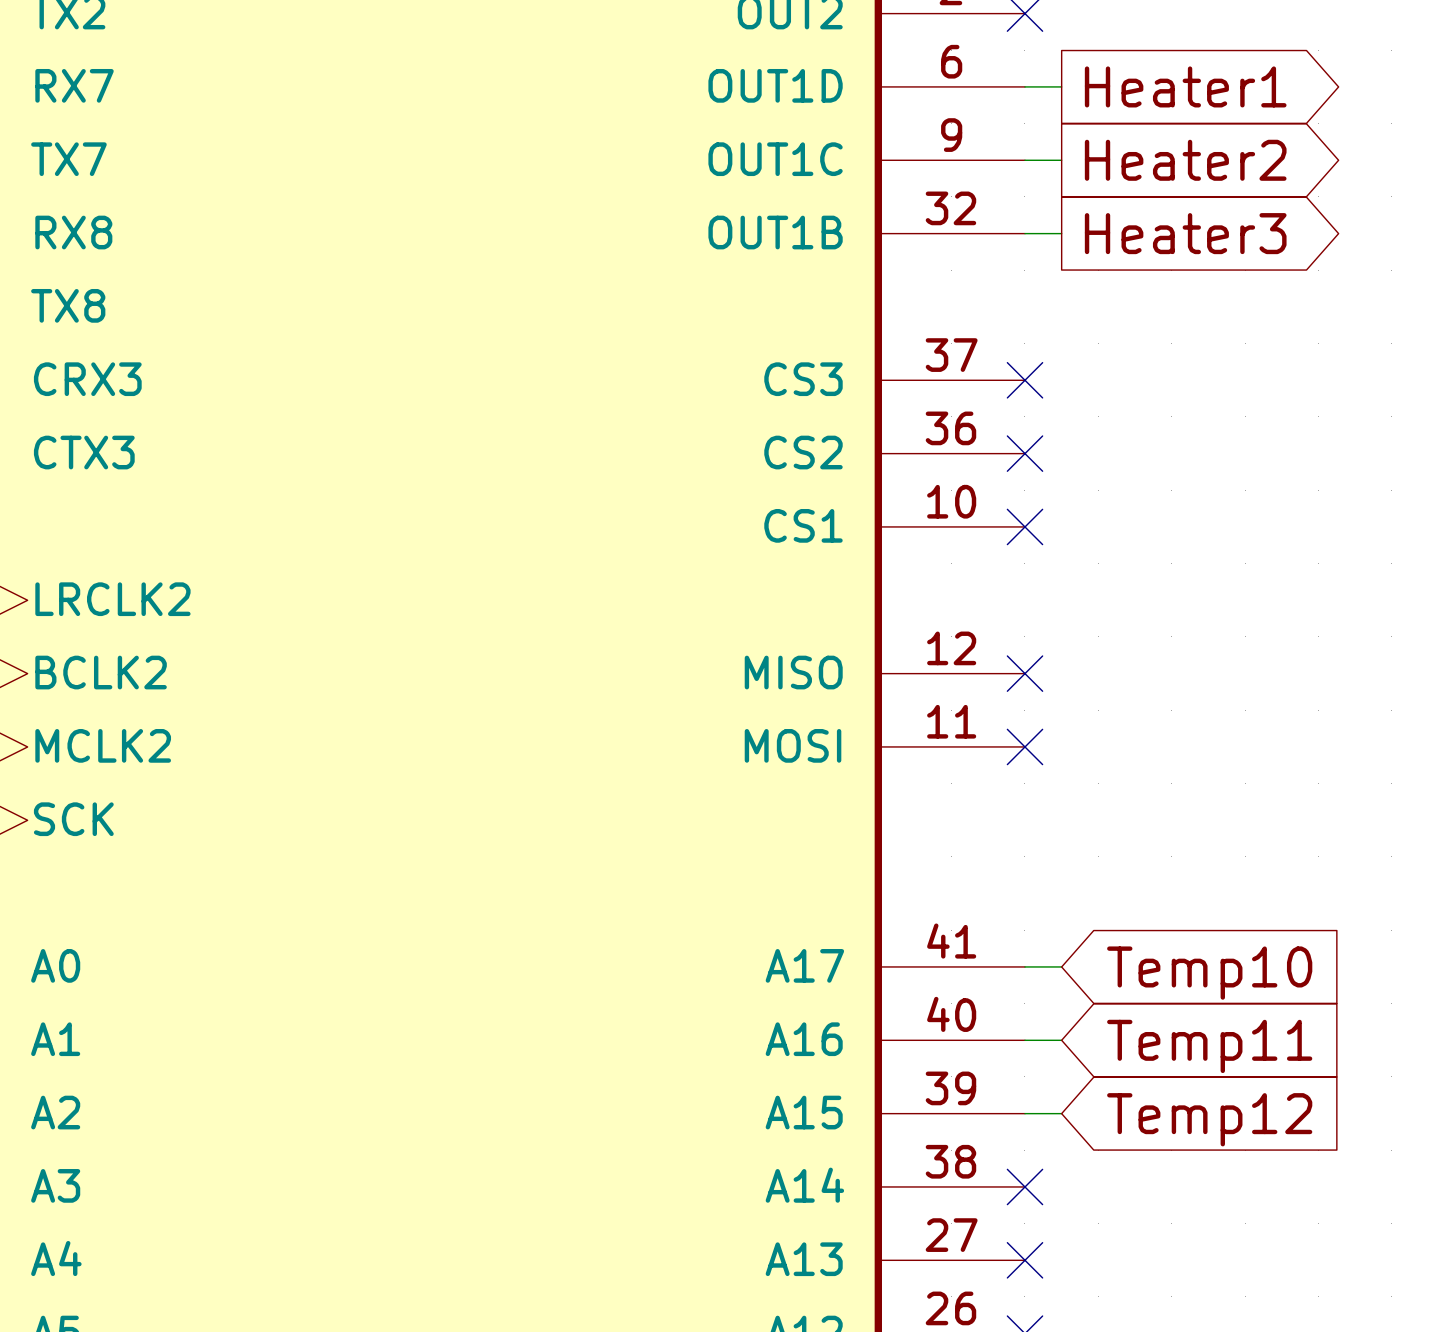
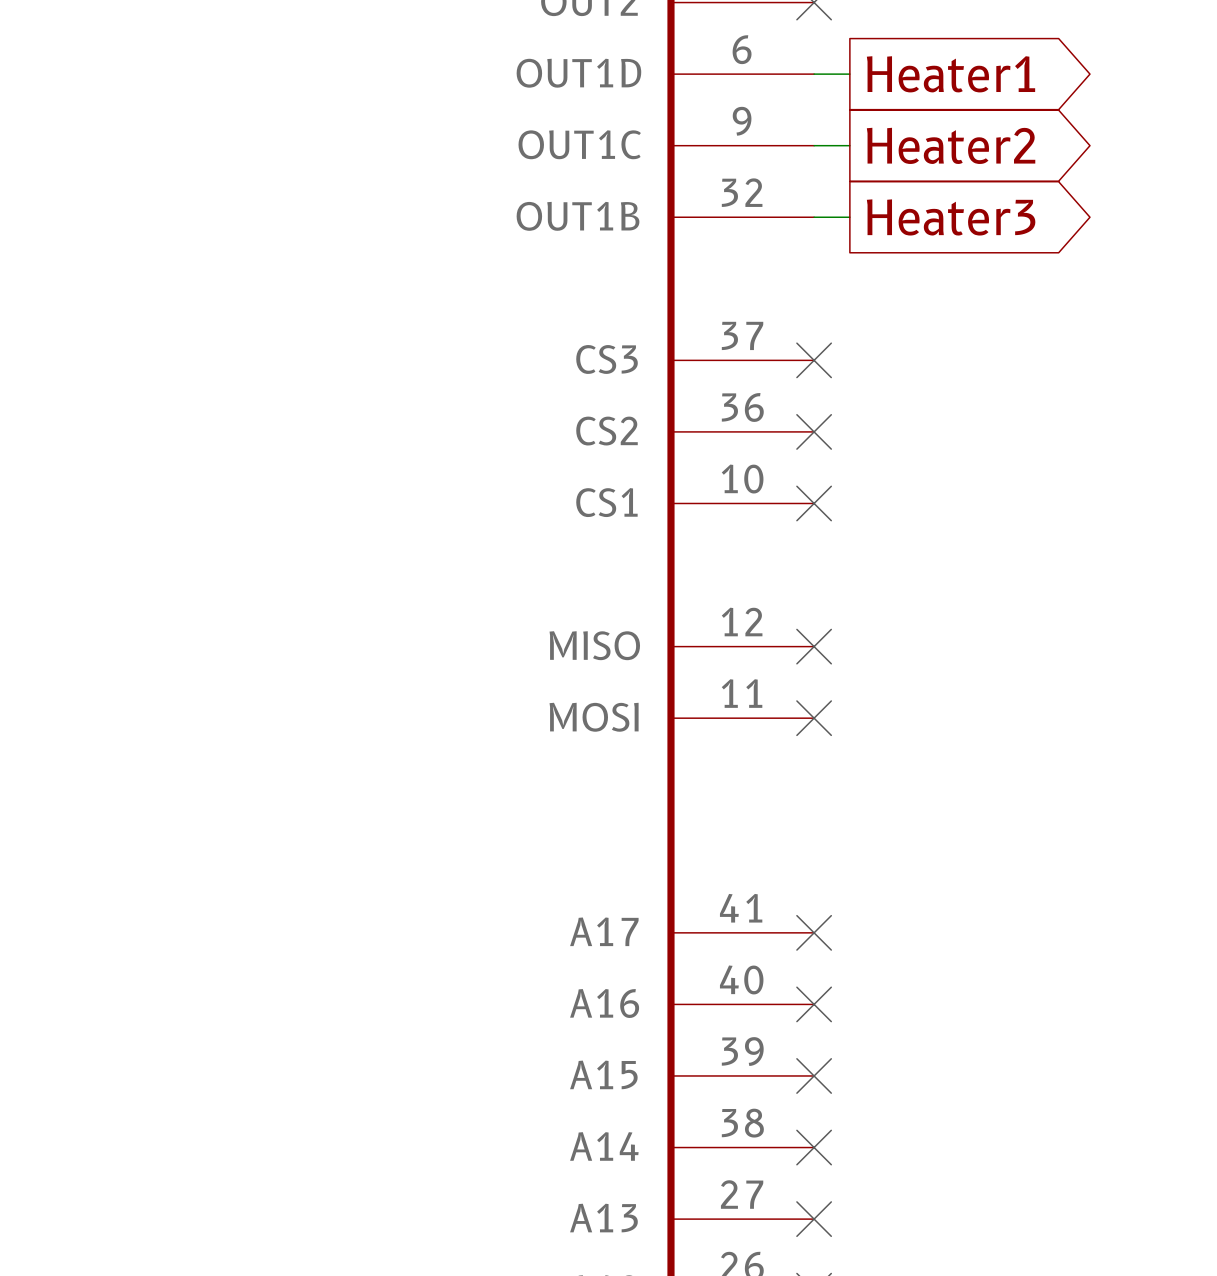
wire: (1024, 966) (1061, 966) -> none
no-connect mark: none -> (814, 932)
global label: Temp10 (1209, 973) -> none
wire: (1024, 1040) (1061, 1040) -> none
no-connect mark: none -> (814, 1004)
global label: Temp11 (1209, 1046) -> none
wire: (1024, 1113) (1061, 1113) -> none
no-connect mark: none -> (814, 1075)
global label: Temp12 (1209, 1119) -> none

